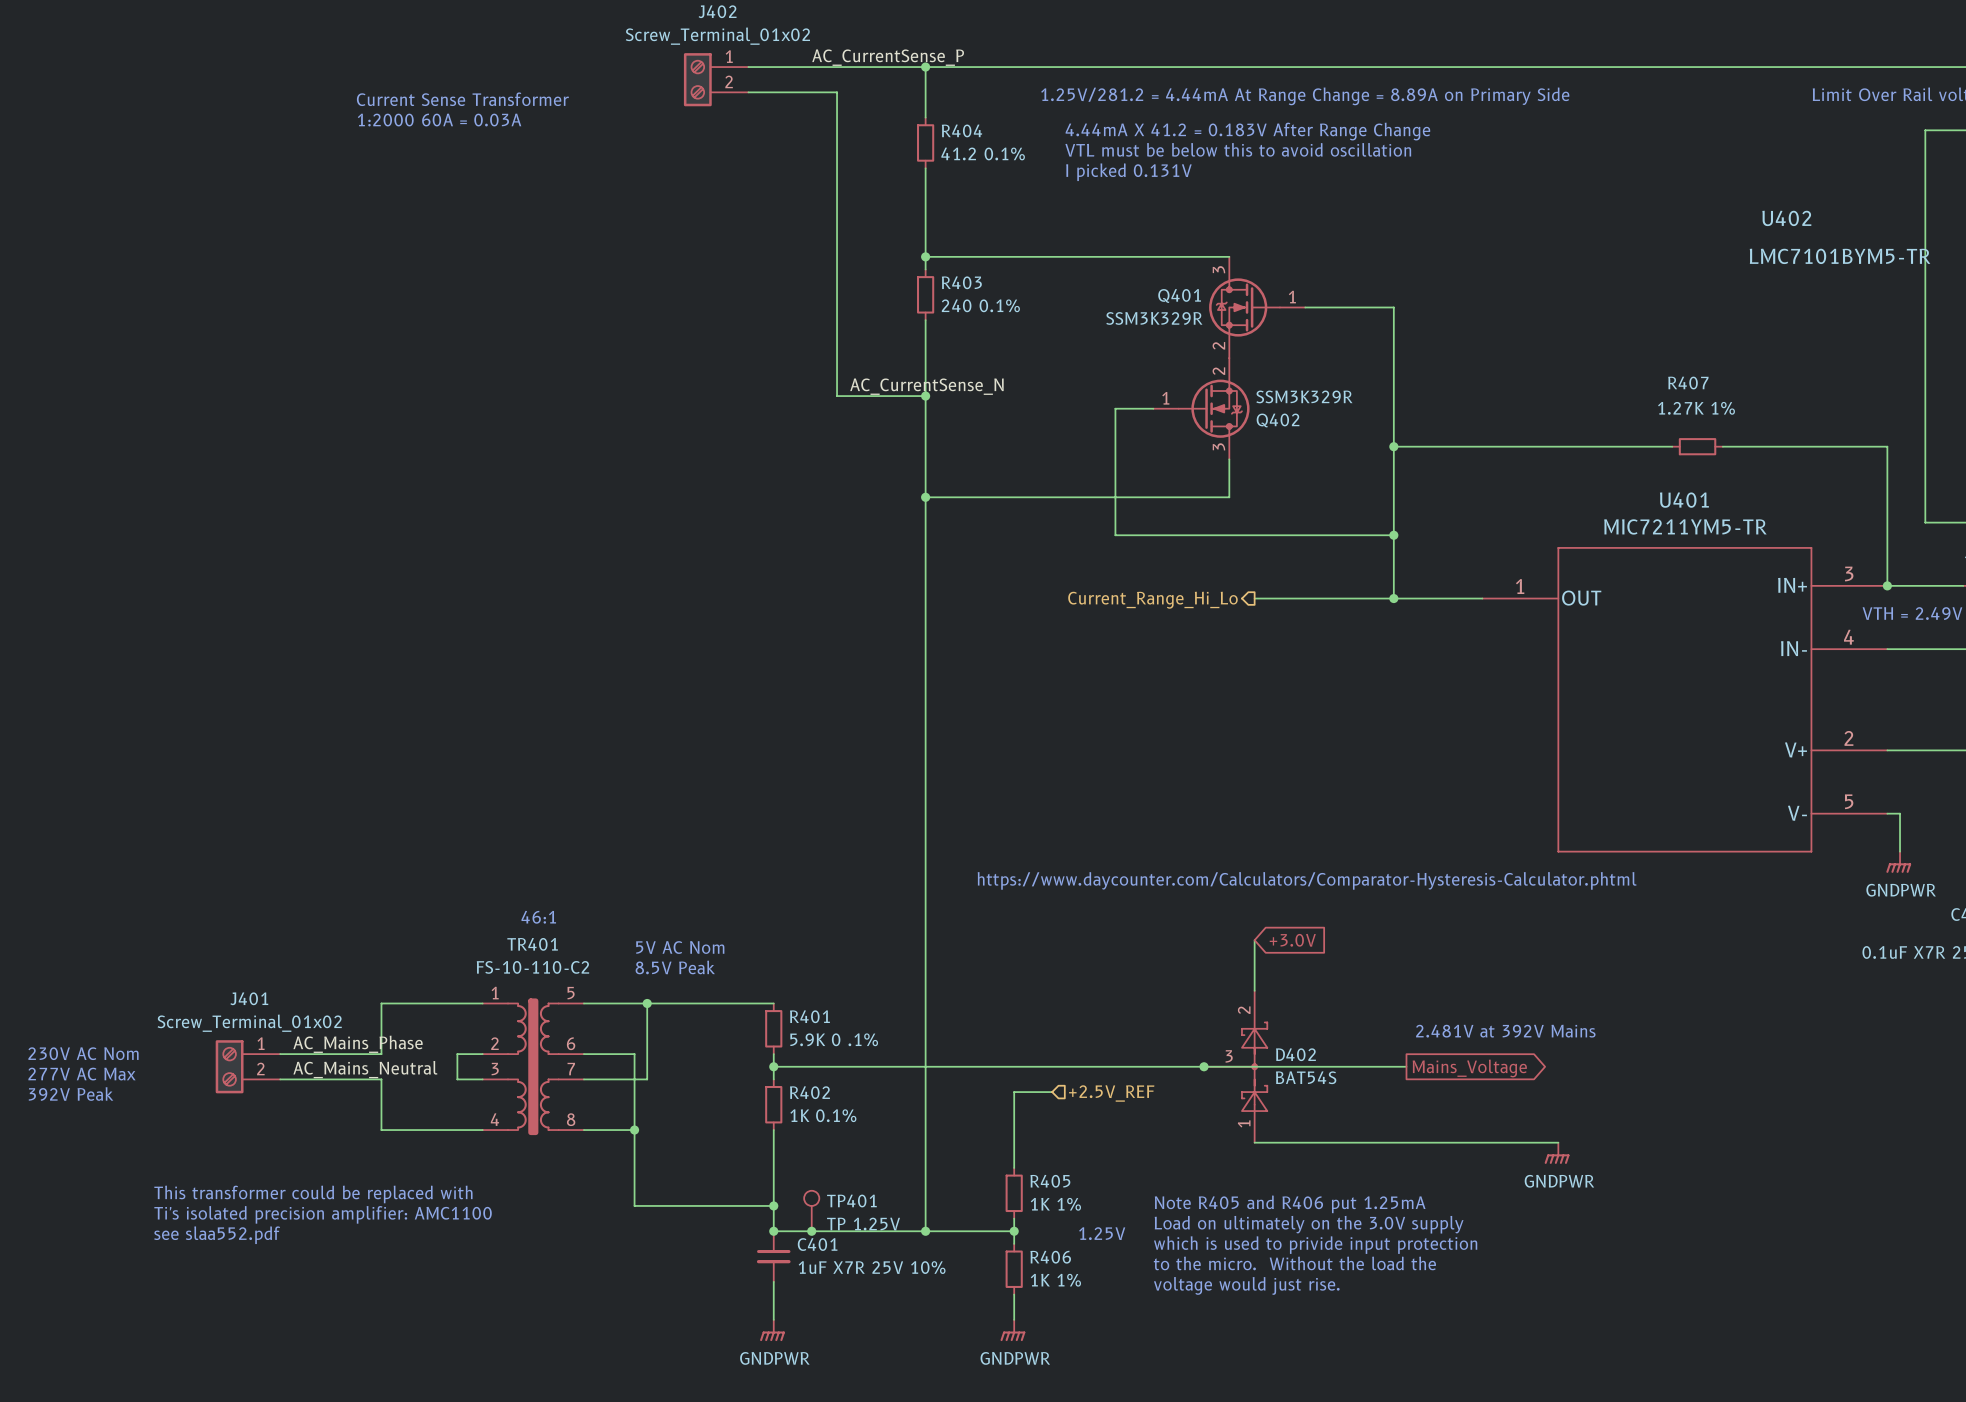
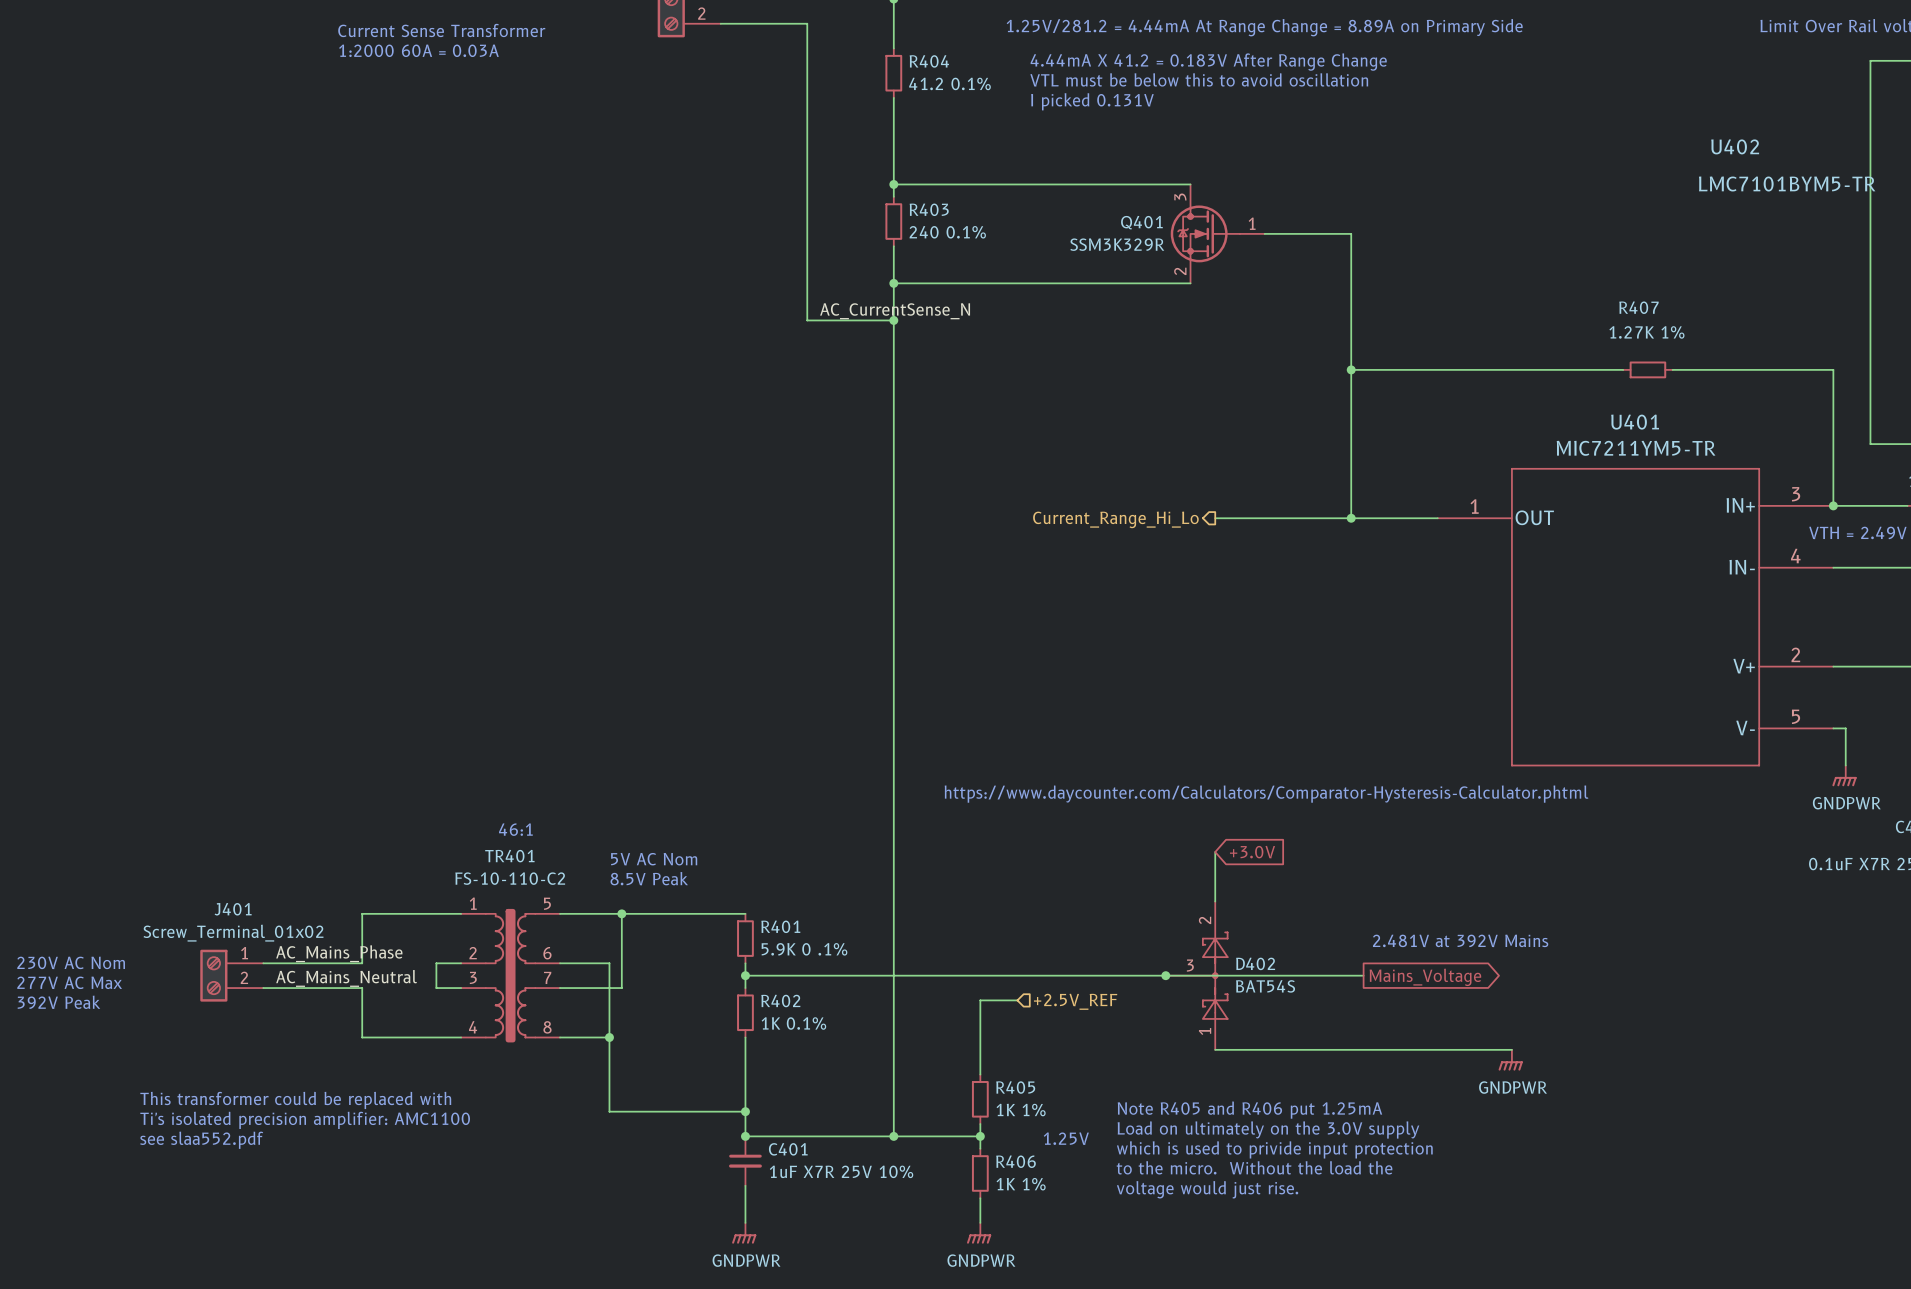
wire: none -> (893, 283) (1190, 283)
junction: none -> (893, 283)
wire: (1153, 408) (1115, 408) (1115, 535) (1393, 535) -> none
Q402: SSM3K329R (1201, 408) -> none
wire: (1229, 459) (1229, 497) (925, 497) -> none
junction: (925, 497) -> none
junction: (1393, 535) -> none
TP401: TP 1.25V (811, 1211) -> none
junction: (811, 1231) -> none

